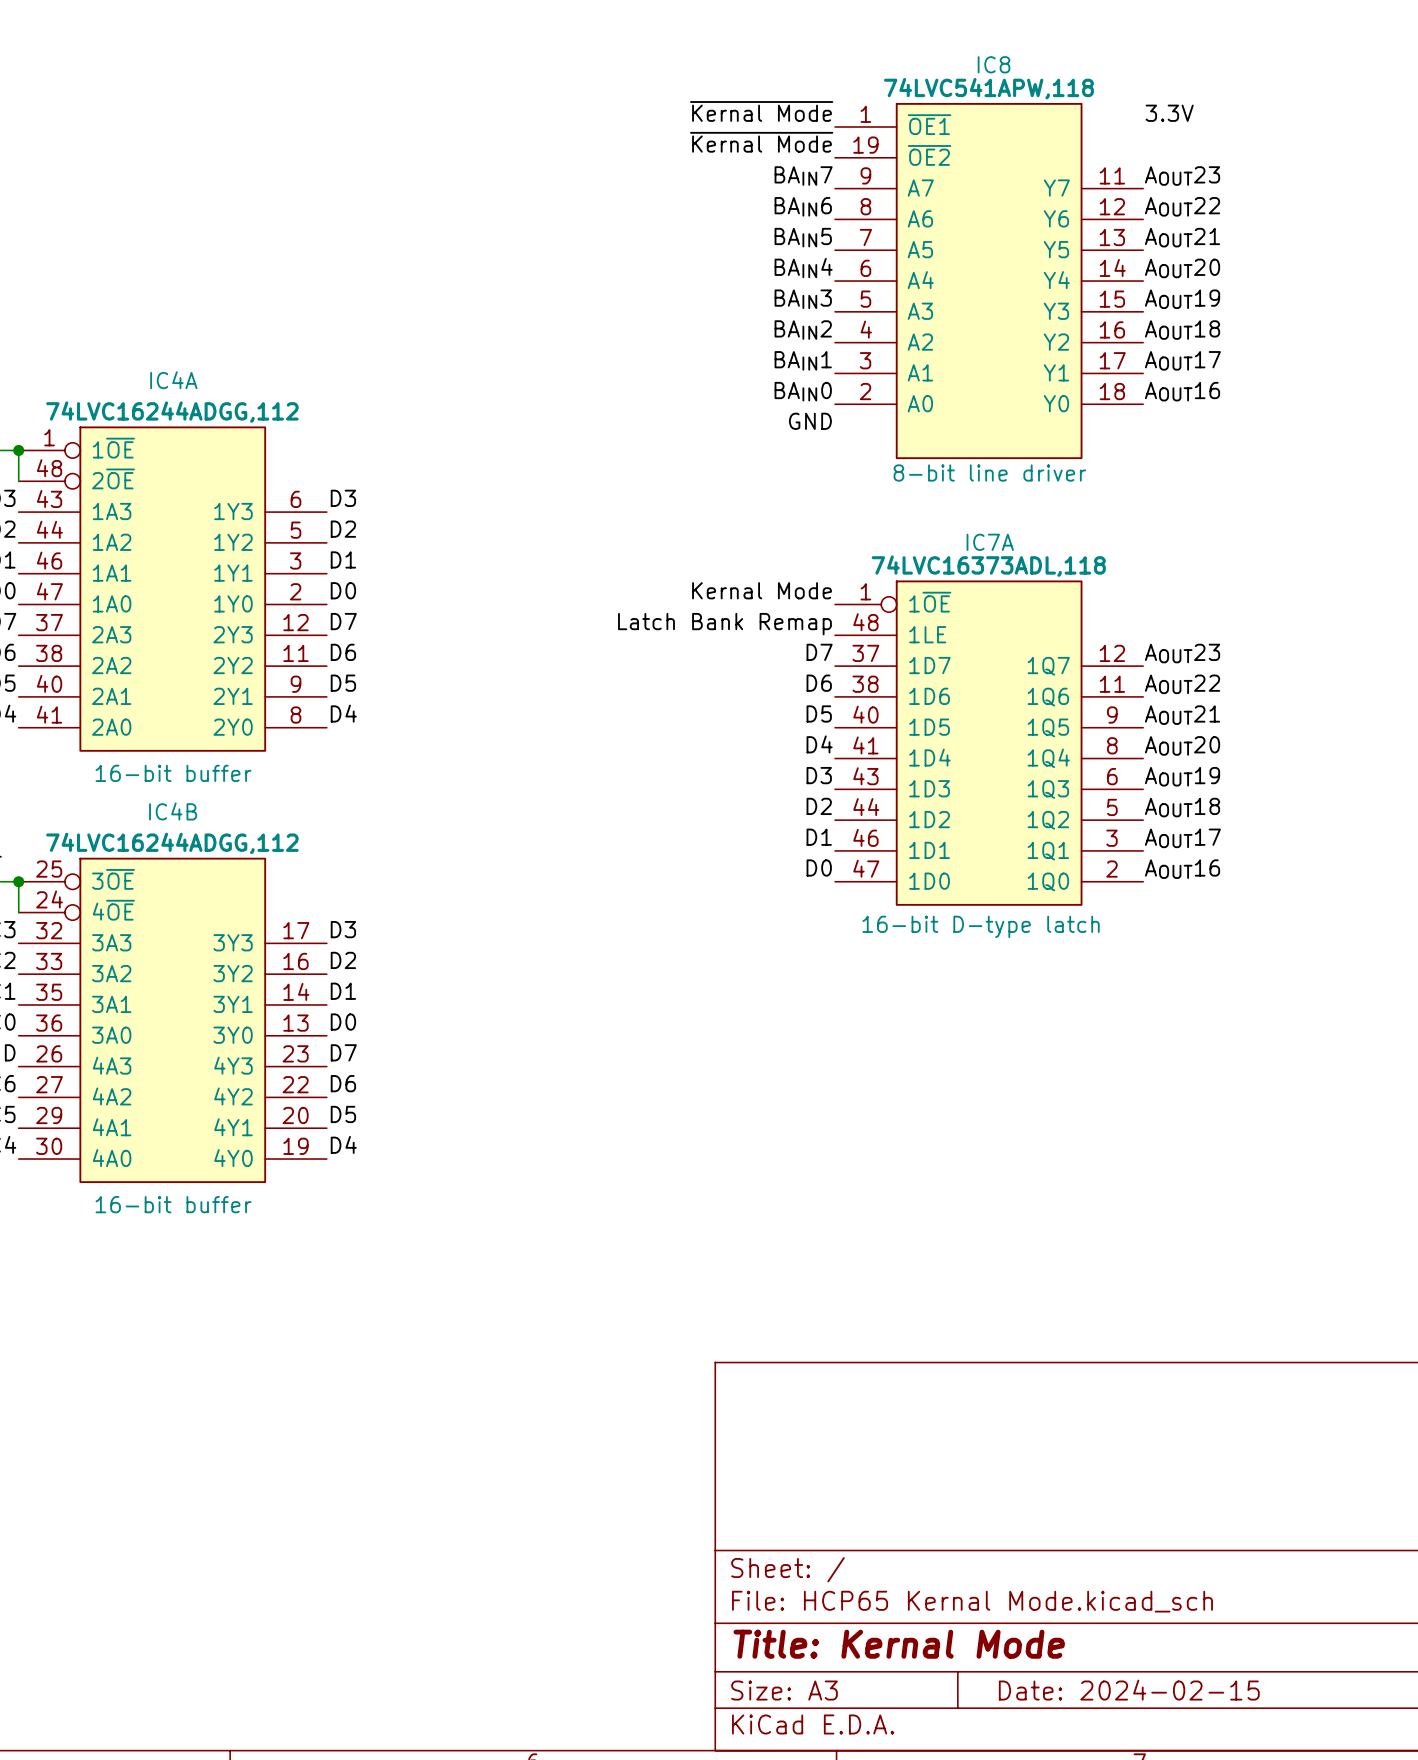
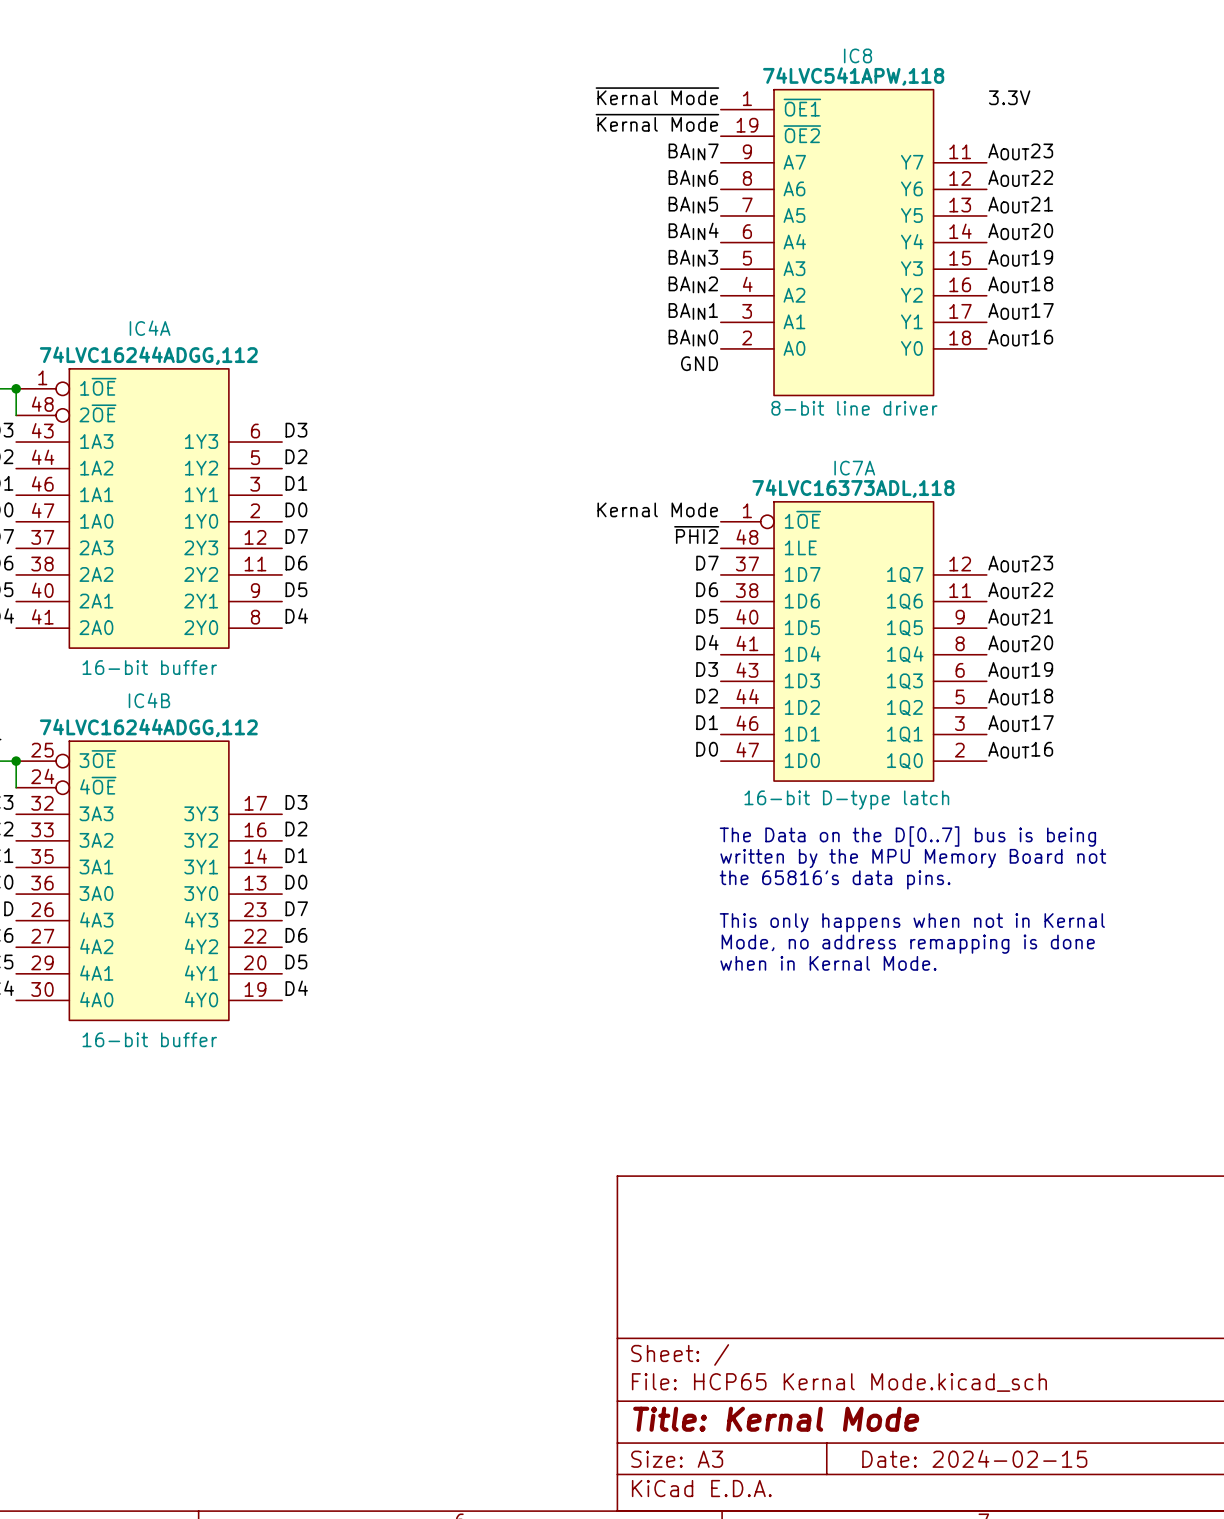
label: Latch Bank Remap (724, 624) -> ~{PHI2} (696, 534)
text: none -> The Data on the D[0..7] bus is being (907, 836)
text: none -> written by the MPU Memory Board not (913, 858)
text: none -> the 65816's data pins. (835, 879)
text: none -> This only happens when not in Kernal (912, 922)
text: none -> Mode, no address remapping is done (908, 944)
text: none -> when in Kernal Mode. (828, 963)

